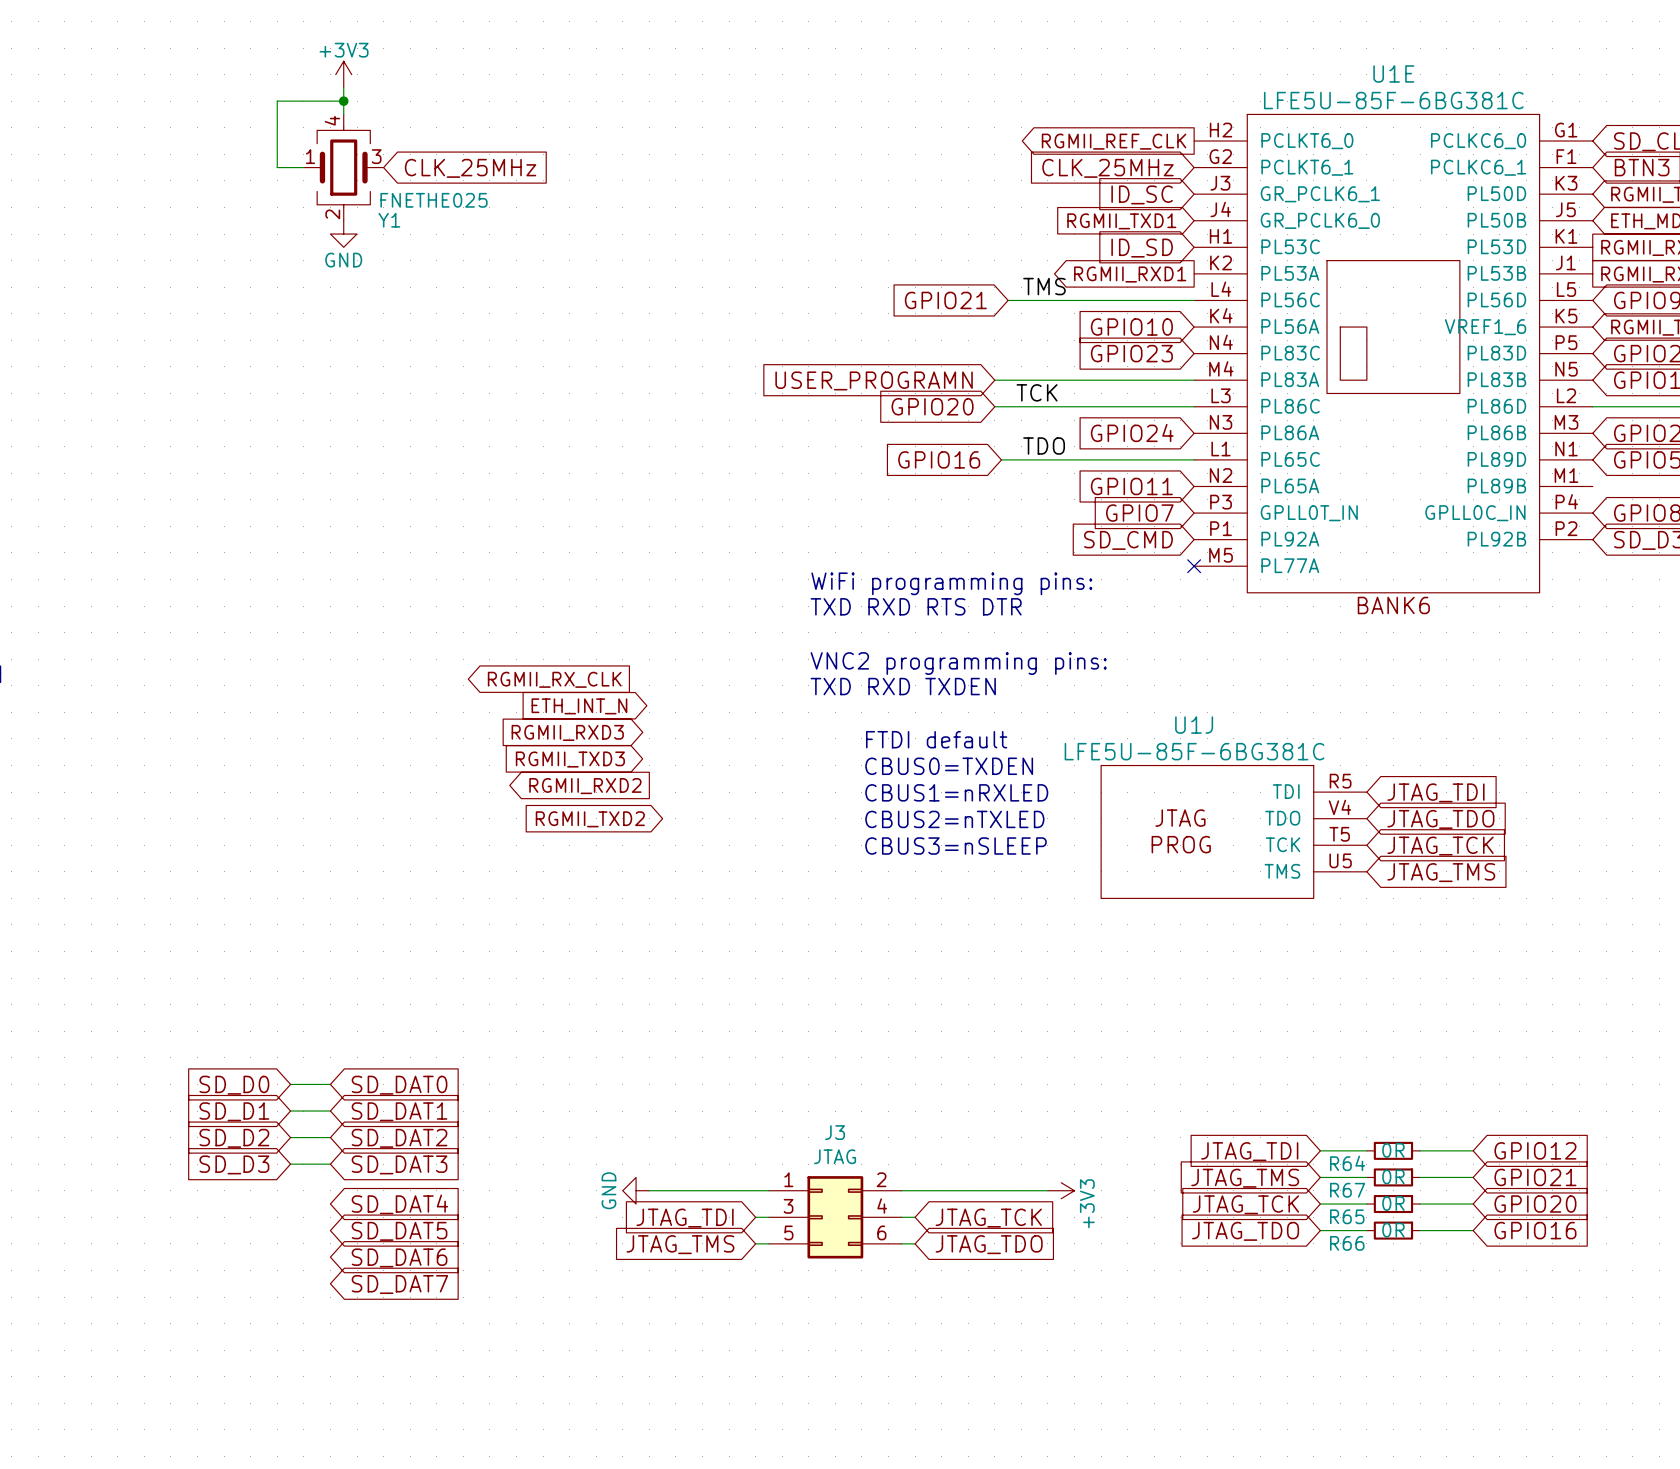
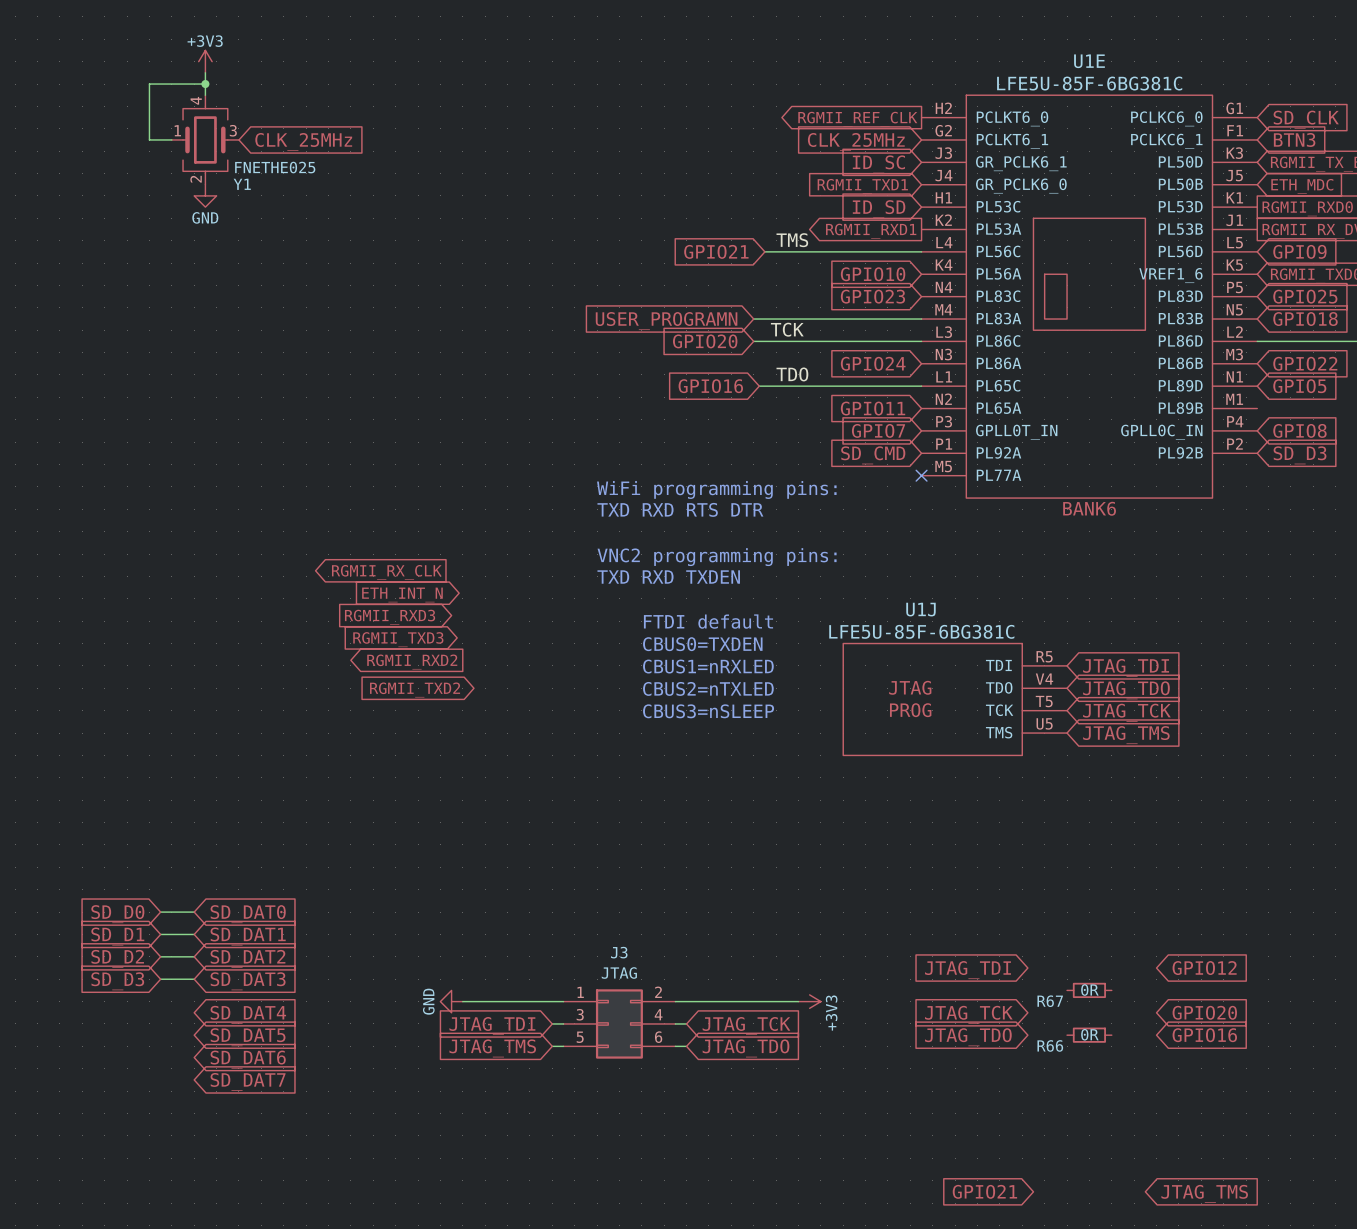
wire: (1320, 1150) (1366, 1150) -> none
R64: 0R (1393, 1150) -> none
wire: (1420, 1150) (1473, 1150) -> none
wire: (1320, 1177) (1366, 1177) -> none
wire: (1420, 1177) (1473, 1177) -> none
global label: GPIO21 (1535, 1177) -> none
global label: JTAG_TMS (1245, 1178) -> none
wire: (1320, 1204) (1366, 1204) -> none
R65: 0R (1393, 1204) -> none
wire: (1420, 1204) (1473, 1204) -> none
wire: (1320, 1230) (1366, 1230) -> none
wire: (1420, 1230) (1473, 1230) -> none
global label: none -> GPIO21 (984, 1191)
global label: none -> JTAG_TMS (1204, 1193)

